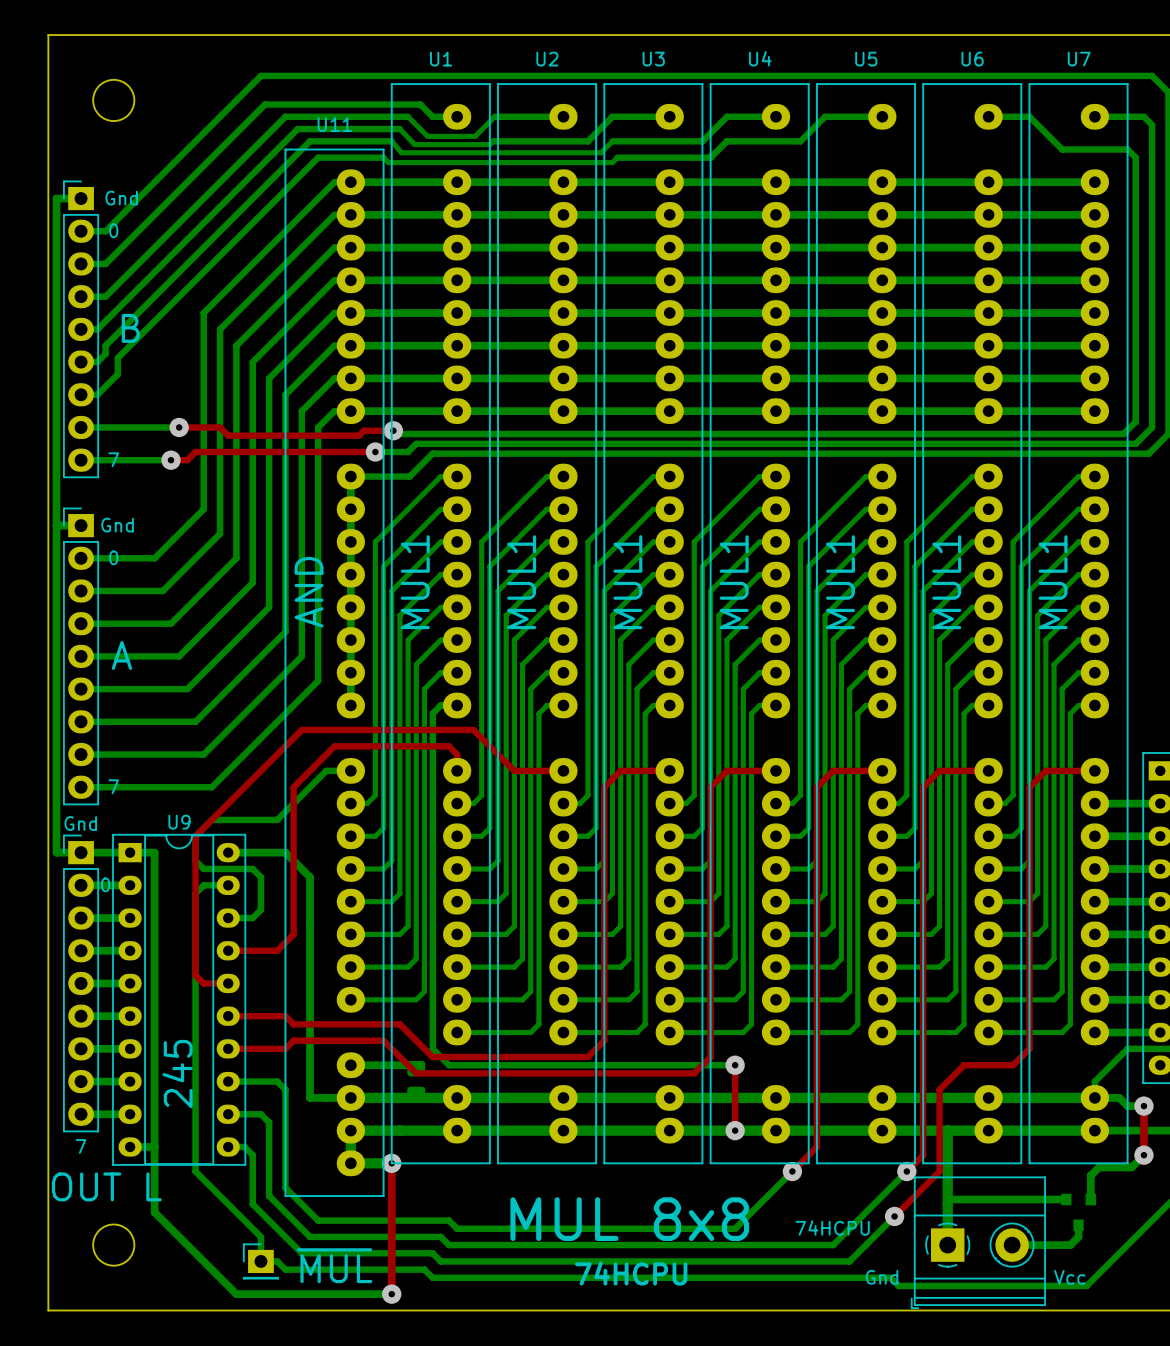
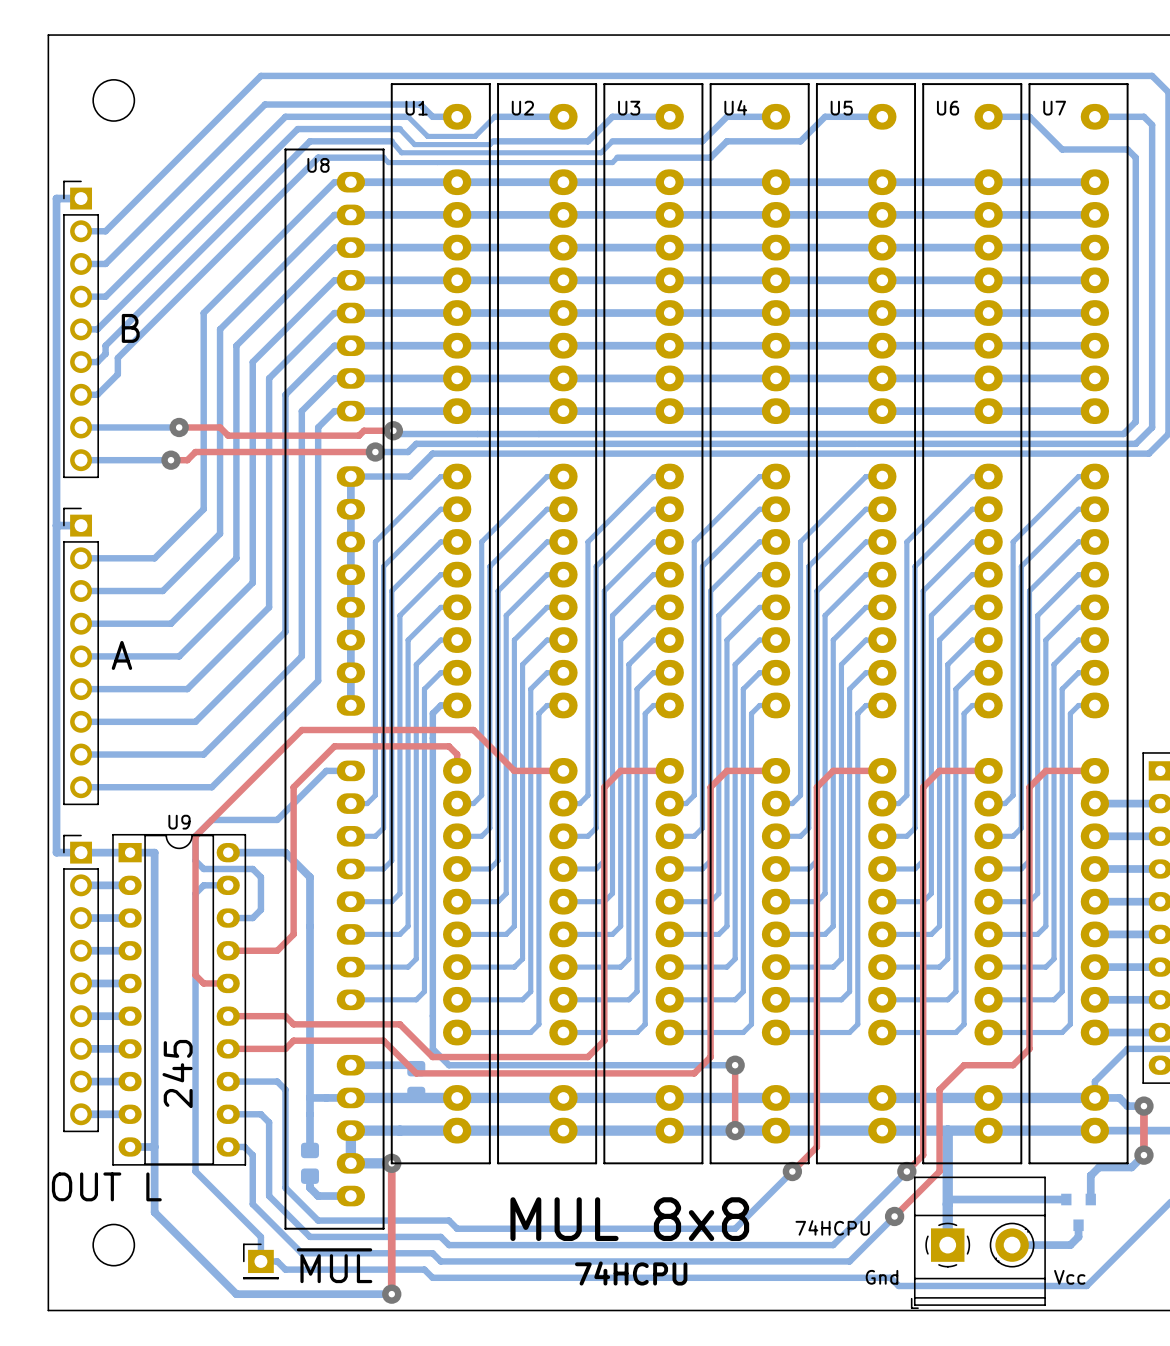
U4 name position: U4 (760, 58) -> U4 (735, 107)
U1 name position: U1 (441, 59) -> U1 (416, 108)
U2 name position: U2 (547, 59) -> U2 (522, 108)
U3 name position: U3 (653, 59) -> U3 (629, 108)
U5 name position: U5 (866, 59) -> U5 (841, 108)
U6 name position: U6 (972, 59) -> U6 (948, 108)
U7 name position: U7 (1079, 59) -> U7 (1054, 108)
part footprint: [63, 180, 99, 479] -> [63, 180, 99, 479]
text: Gnd (121, 198) -> none
text: 0 (113, 230) -> none
text: 7 (113, 459) -> none
part footprint: [63, 507, 99, 806] -> [63, 507, 99, 806]
text: Gnd (117, 525) -> none
text: 0 (113, 557) -> none
text: MUL1 (415, 582) -> none
text: MUL1 (521, 582) -> none
text: MUL1 (627, 582) -> none
text: MUL1 (734, 582) -> none
text: MUL1 (840, 582) -> none
text: MUL1 (946, 582) -> none
text: MUL1 (1053, 582) -> none
text: AND (309, 592) -> none
U11: (334, 672) -> none
U8: none -> (334, 689)
text: 7 (113, 786) -> none
text: Gnd (80, 823) -> none
part footprint: [63, 834, 99, 1133] -> [63, 834, 99, 1133]
text: 0 (105, 884) -> none
bottom track: none -> (309, 1097) (309, 1150)
text: 7 (81, 1146) -> none
part: none -> (309, 1163)
bottom track: none -> (309, 1176) (309, 1187) (318, 1196) (350, 1196)

